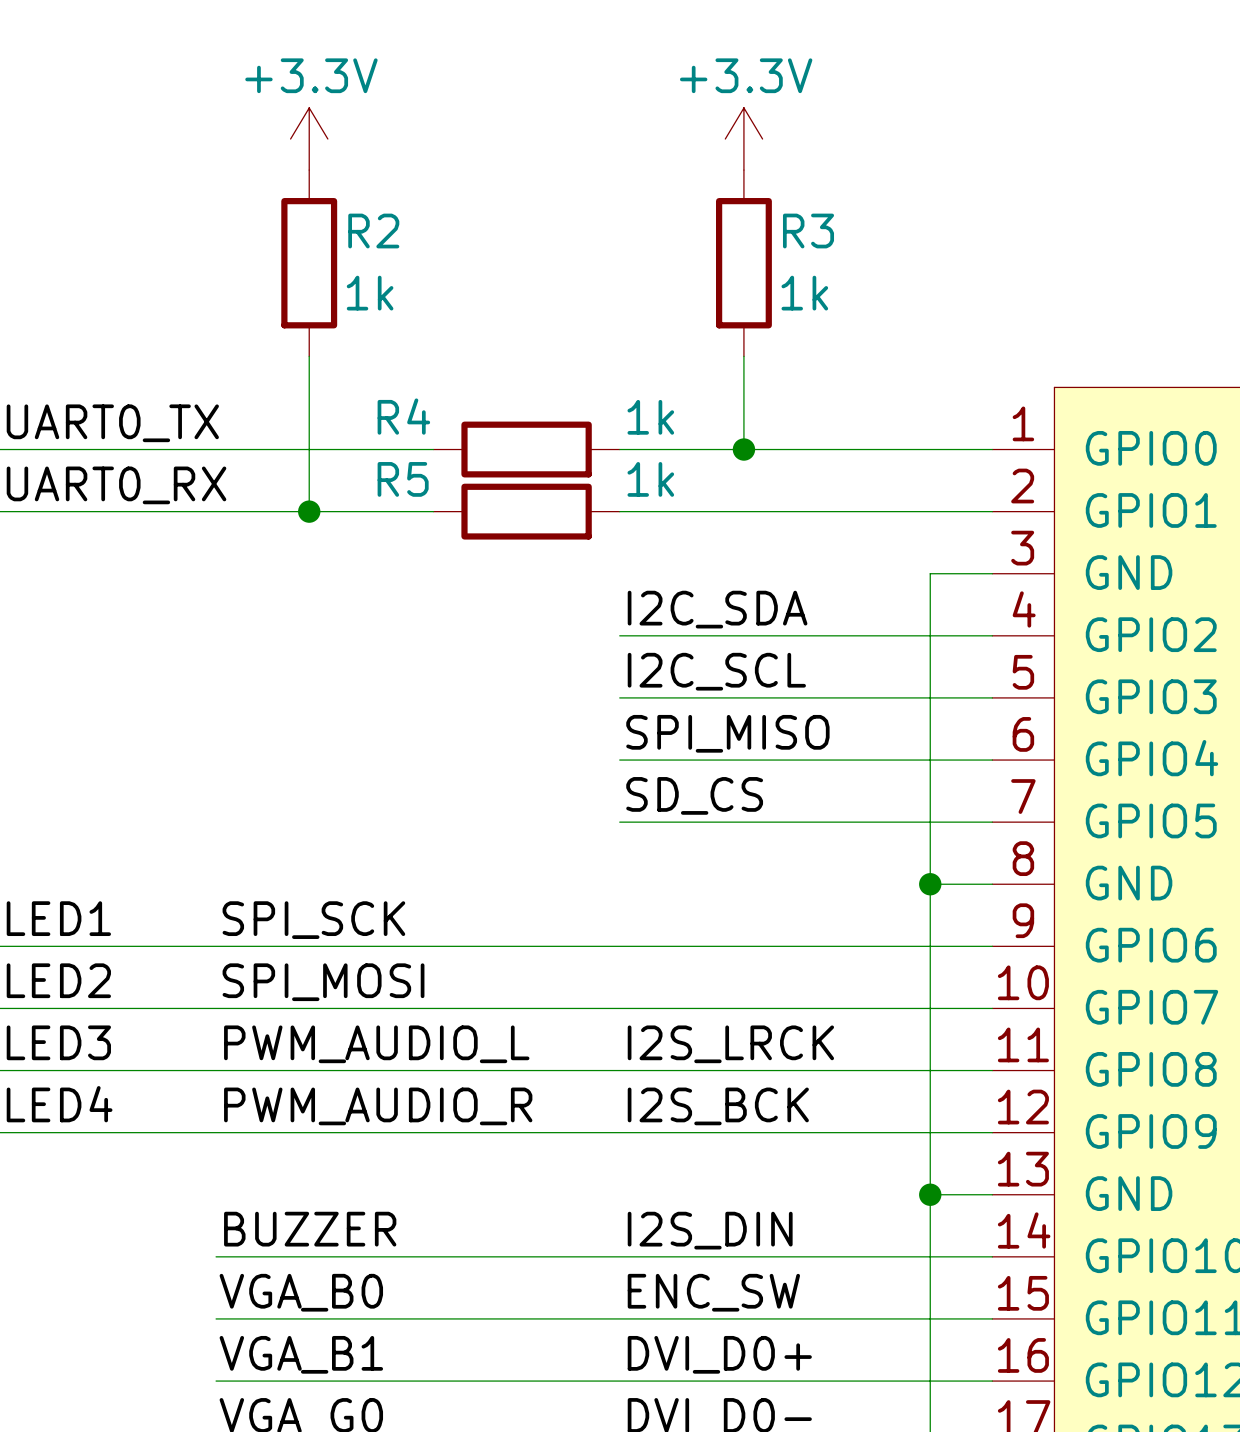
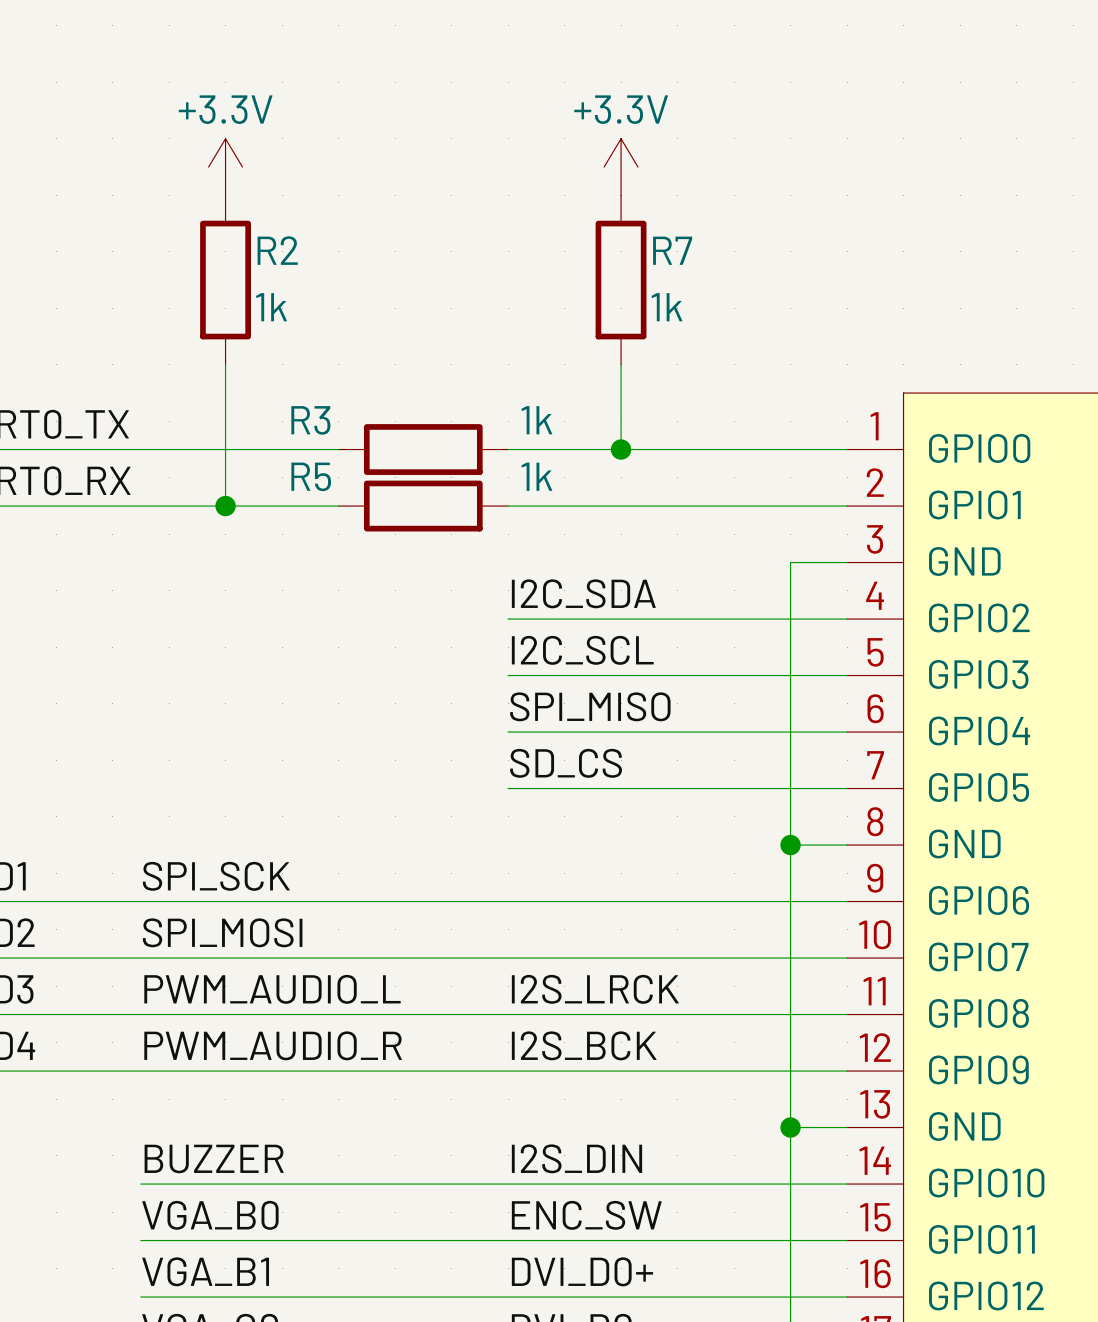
R3 name: R3 (808, 231) -> R7 (672, 250)
R4 name: R4 (403, 416) -> R3 (310, 420)

